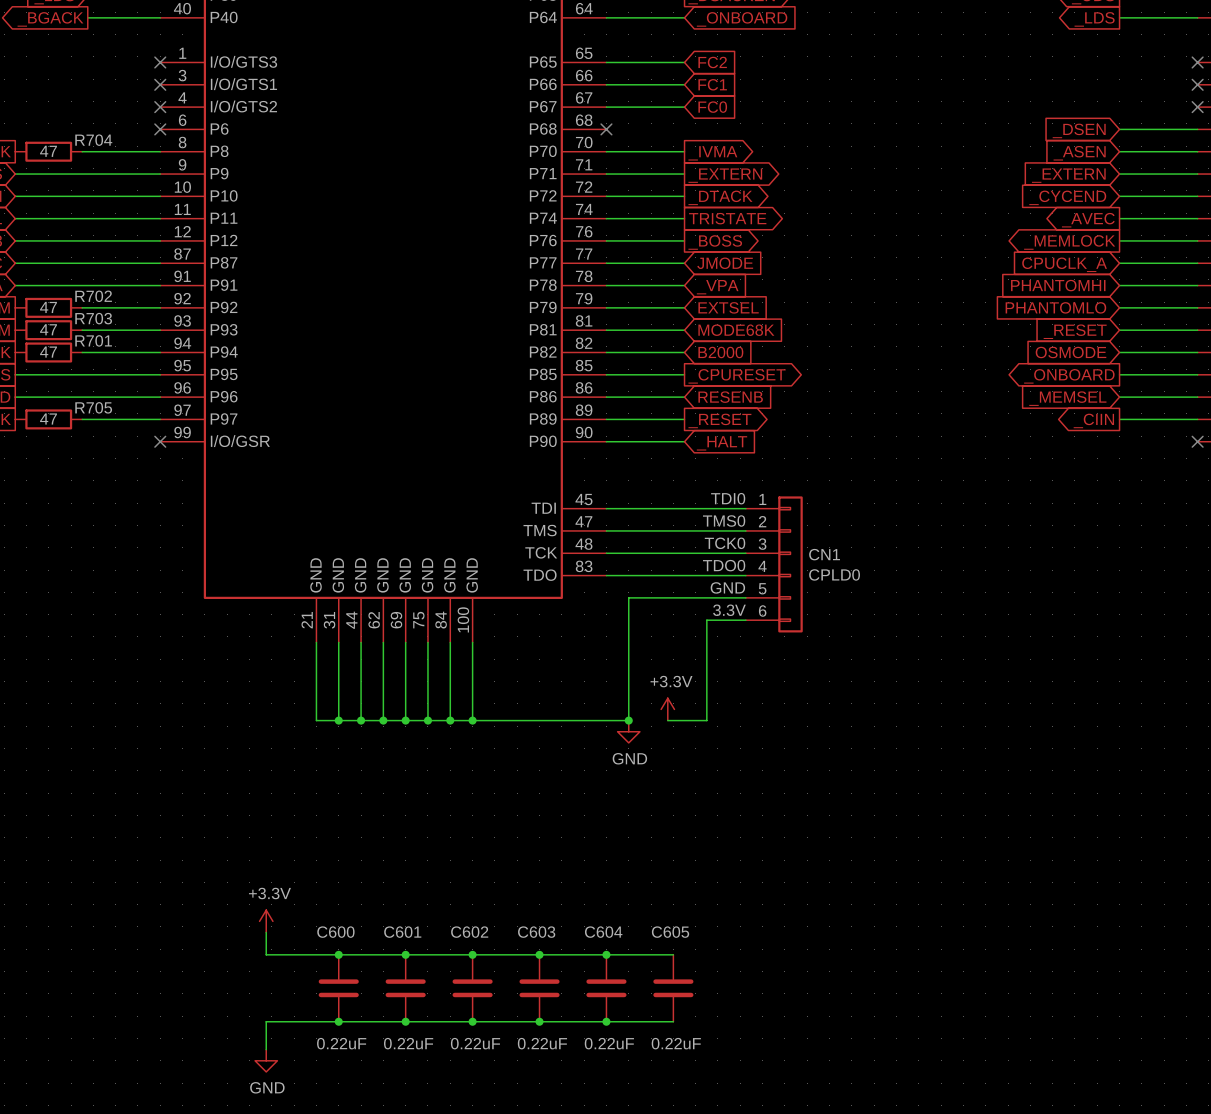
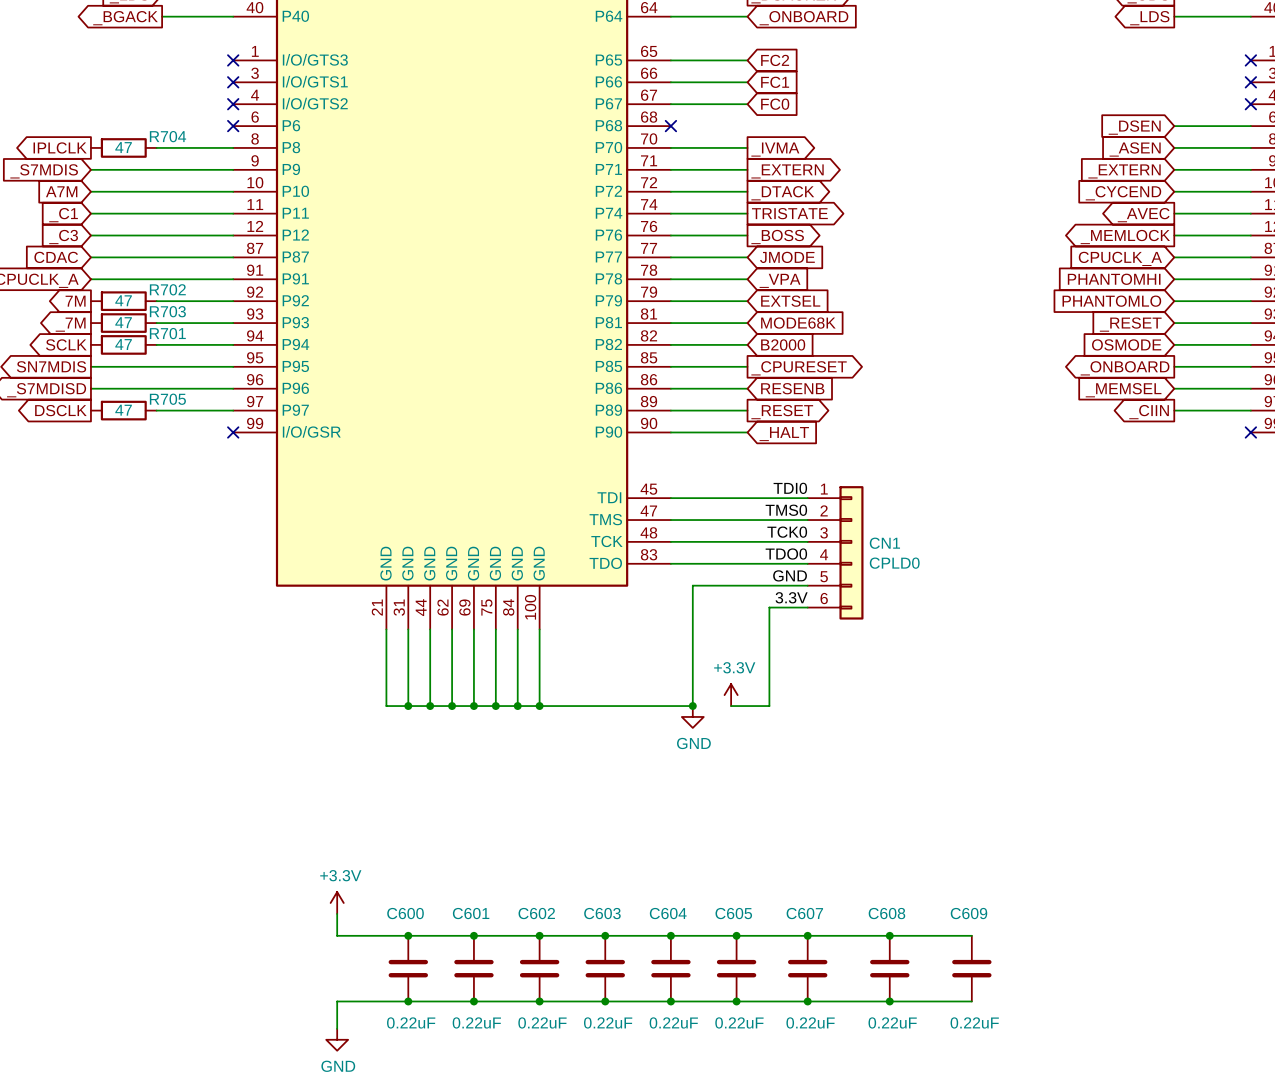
wire: none -> (736, 935) (971, 935)
junction: none -> (736, 935)
junction: none -> (807, 935)
junction: none -> (889, 935)
C607: none -> 0.22uF (807, 968)
C608: none -> 0.22uF (889, 968)
C609: none -> 0.22uF (971, 968)
wire: none -> (736, 1001) (971, 1001)
junction: none -> (736, 1001)
junction: none -> (807, 1001)
junction: none -> (889, 1001)

